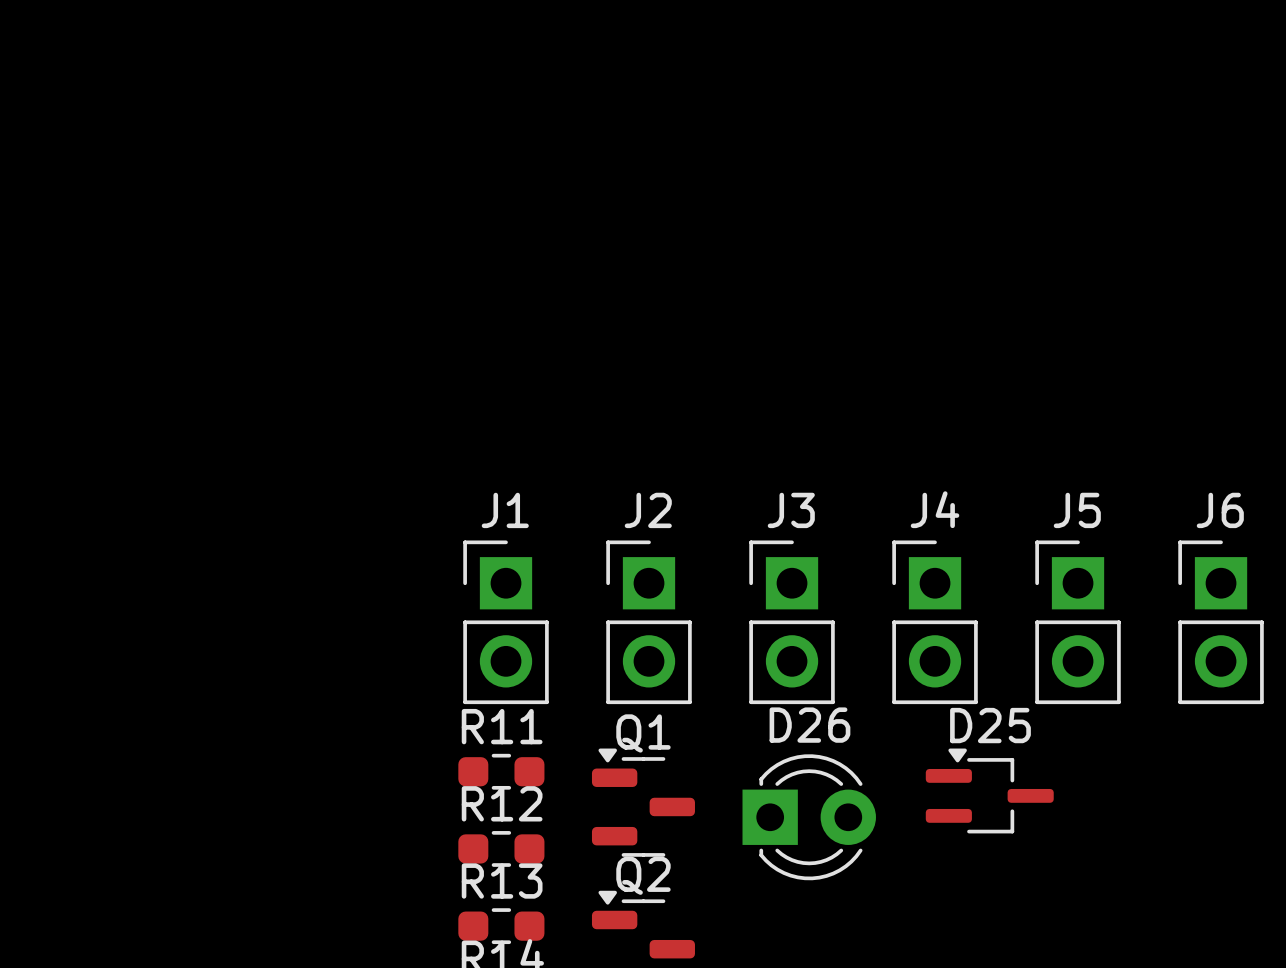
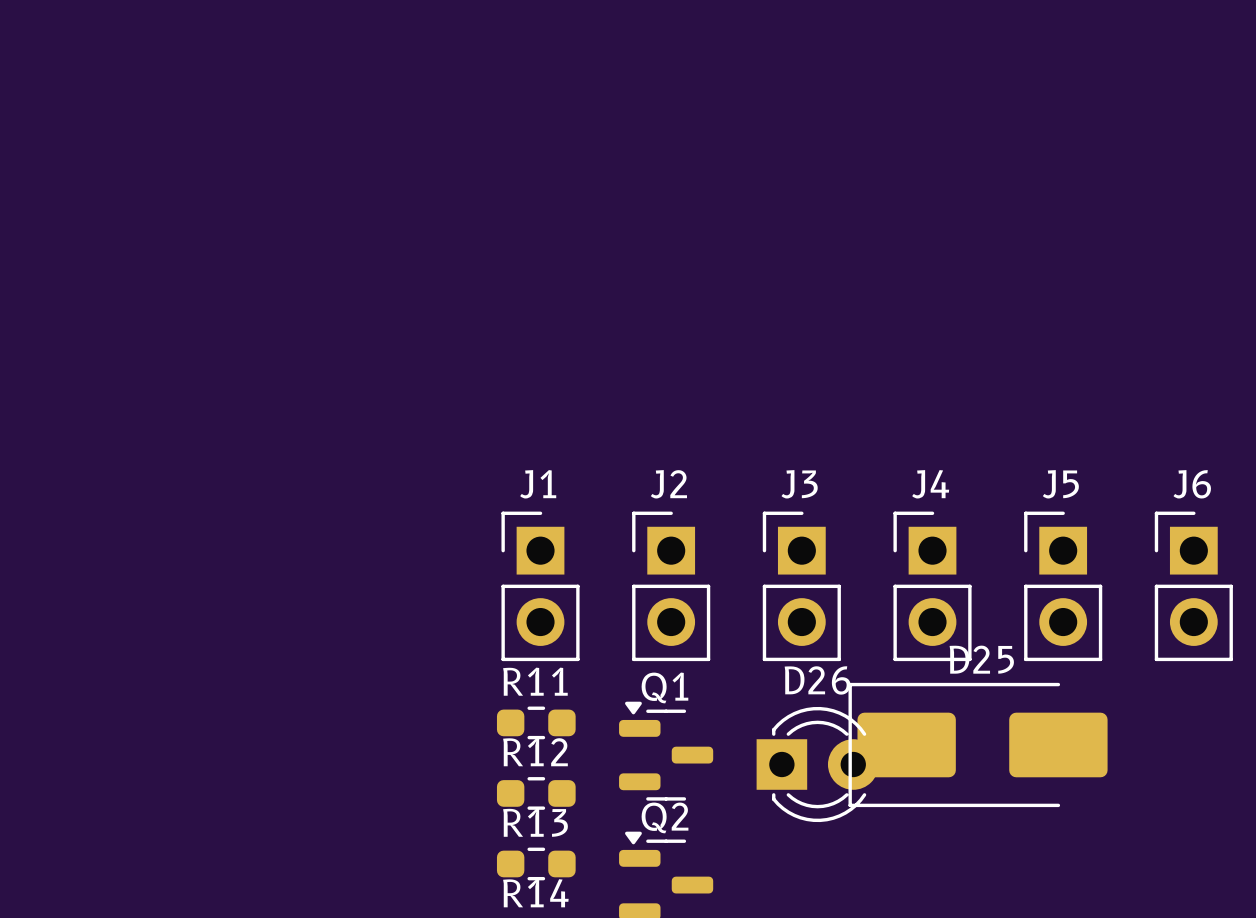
D25 footprint: [925, 748, 1054, 834] -> [848, 682, 1108, 808]

